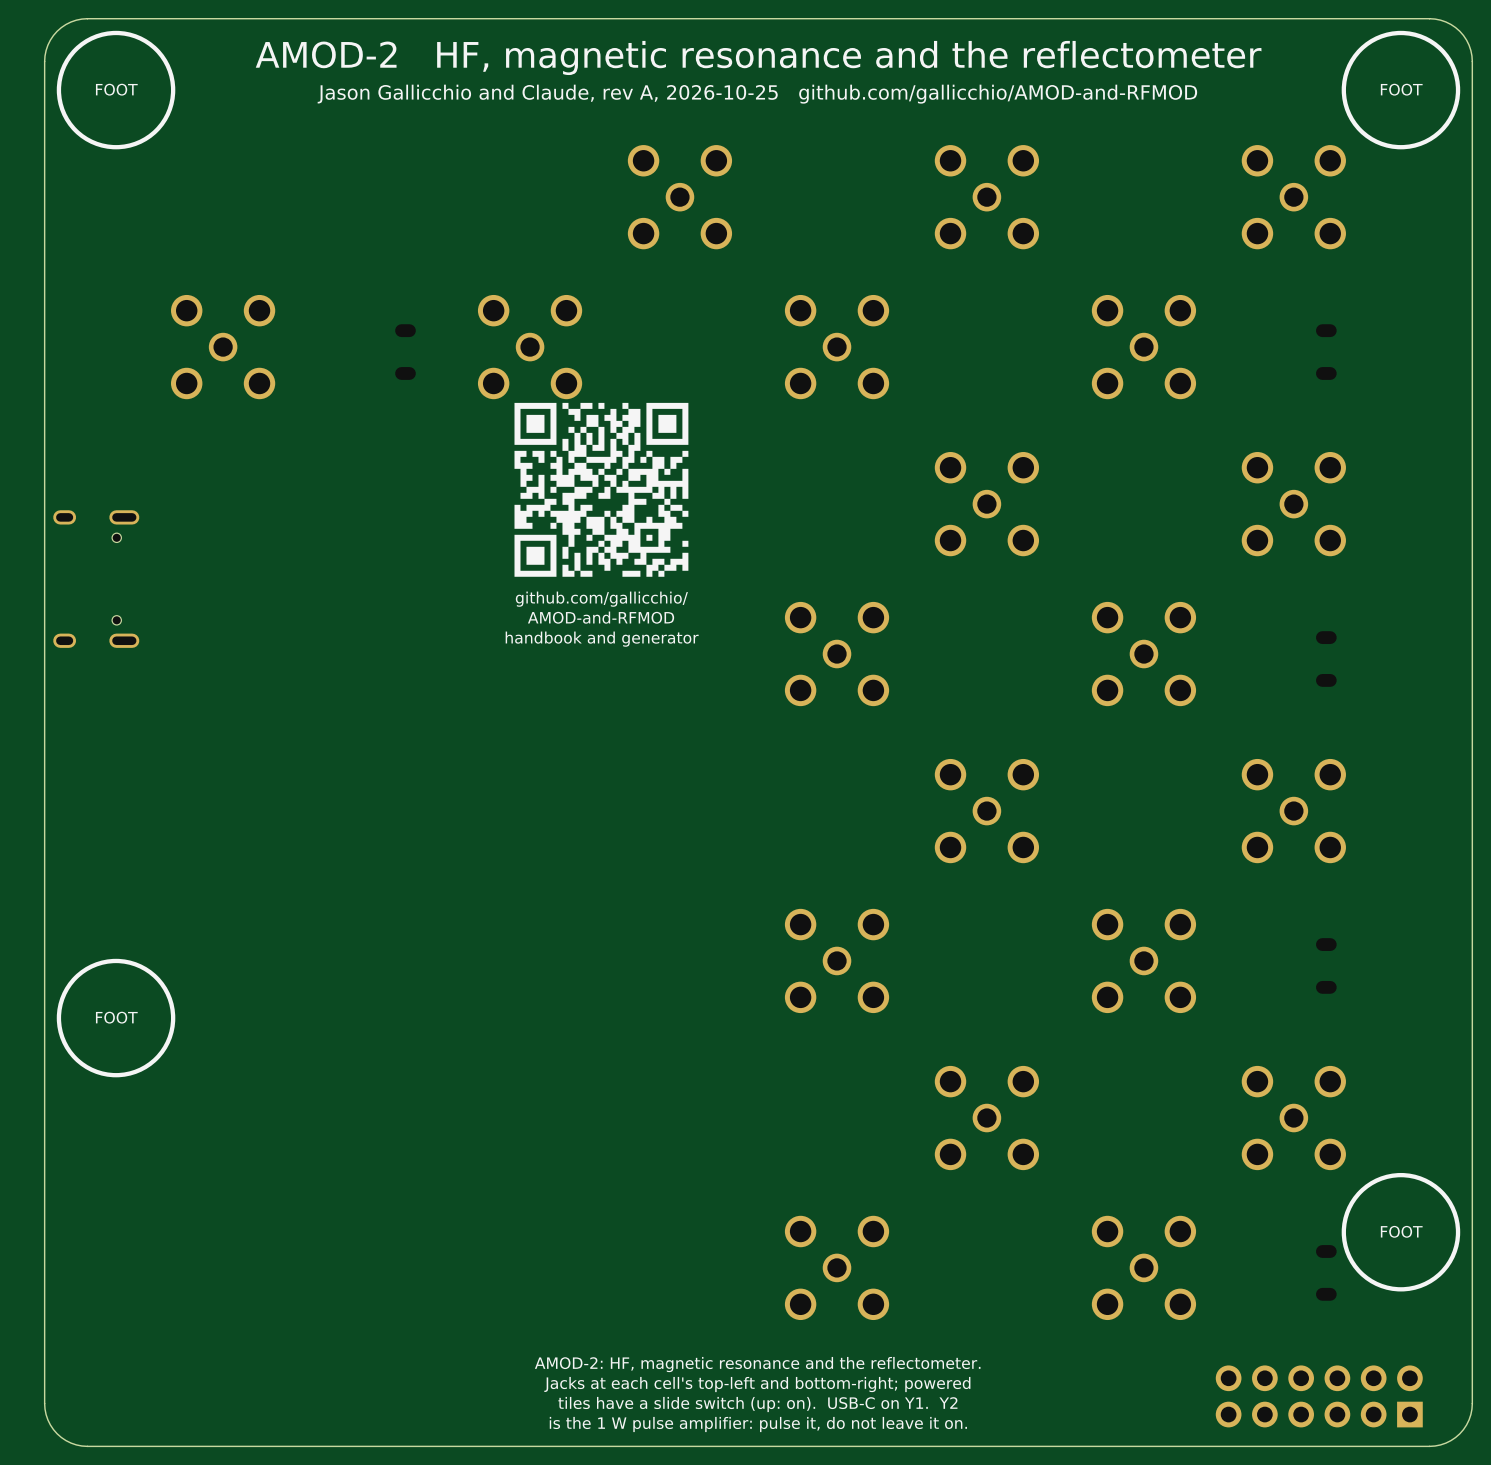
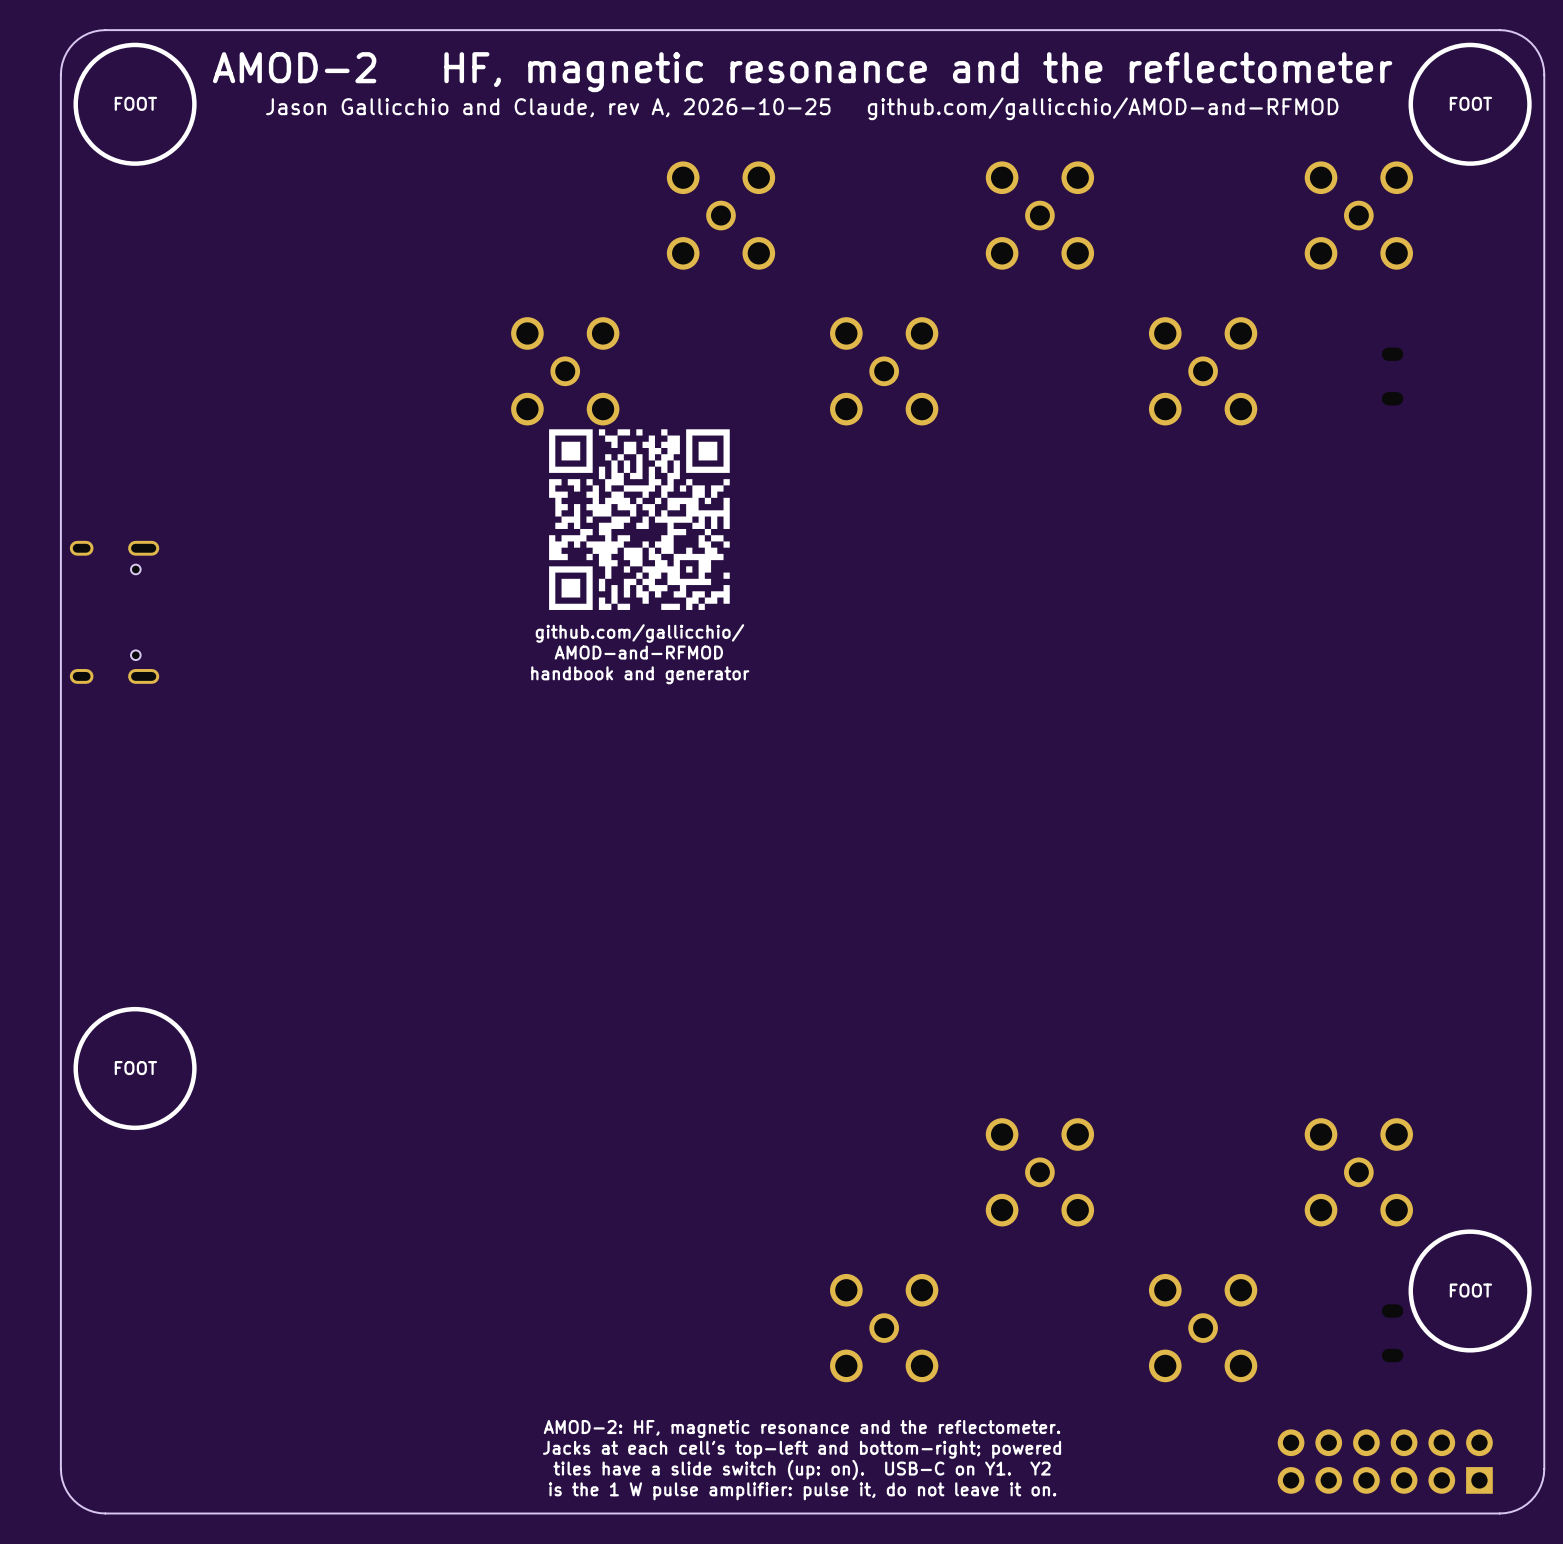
part: (223, 347) -> none
part: (405, 352) -> none
part: (986, 504) -> none
part: (1293, 504) -> none
part: (837, 654) -> none
part: (1143, 654) -> none
part: (1326, 659) -> none
part: (986, 811) -> none
part: (1293, 811) -> none
part: (837, 960) -> none
part: (1143, 960) -> none
part: (1326, 965) -> none

